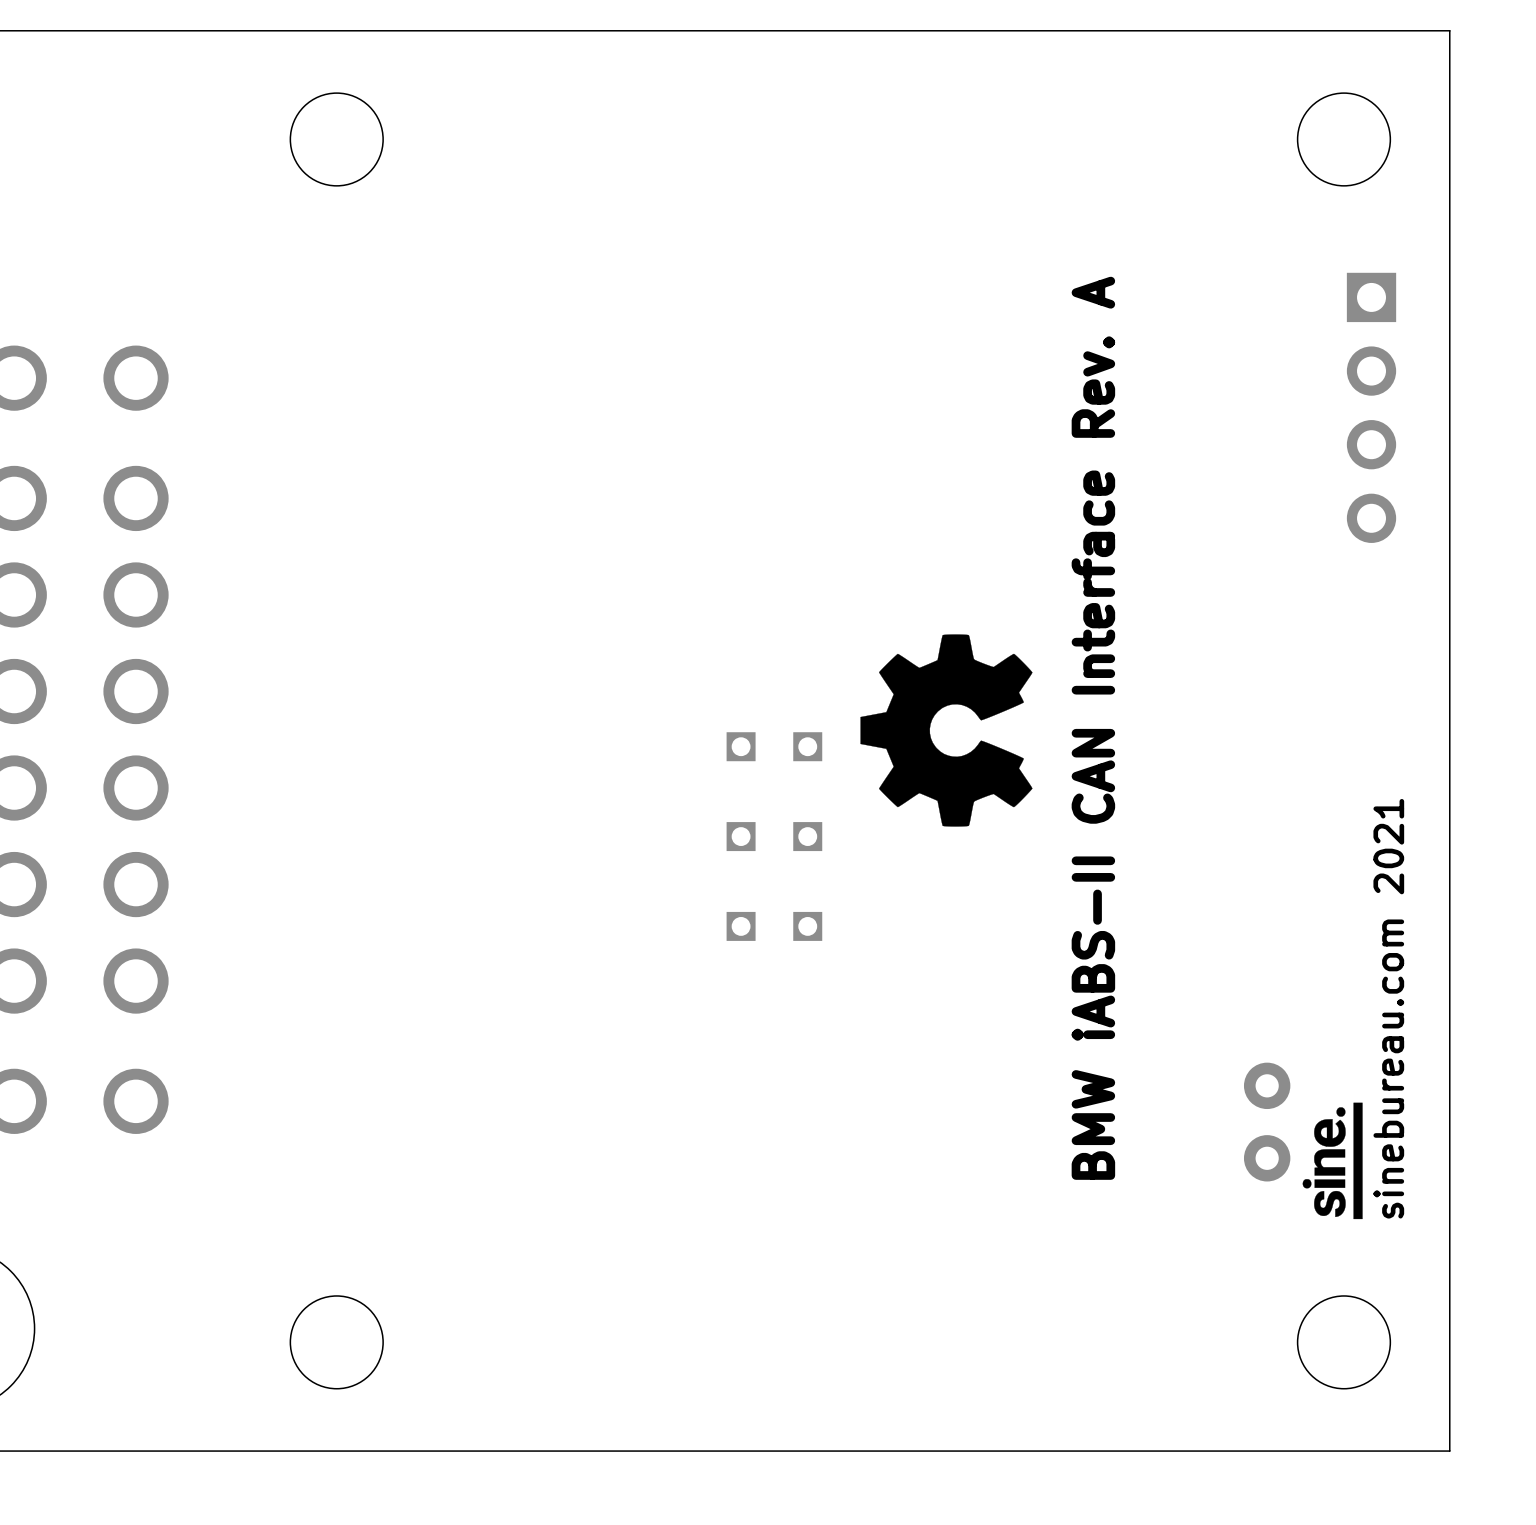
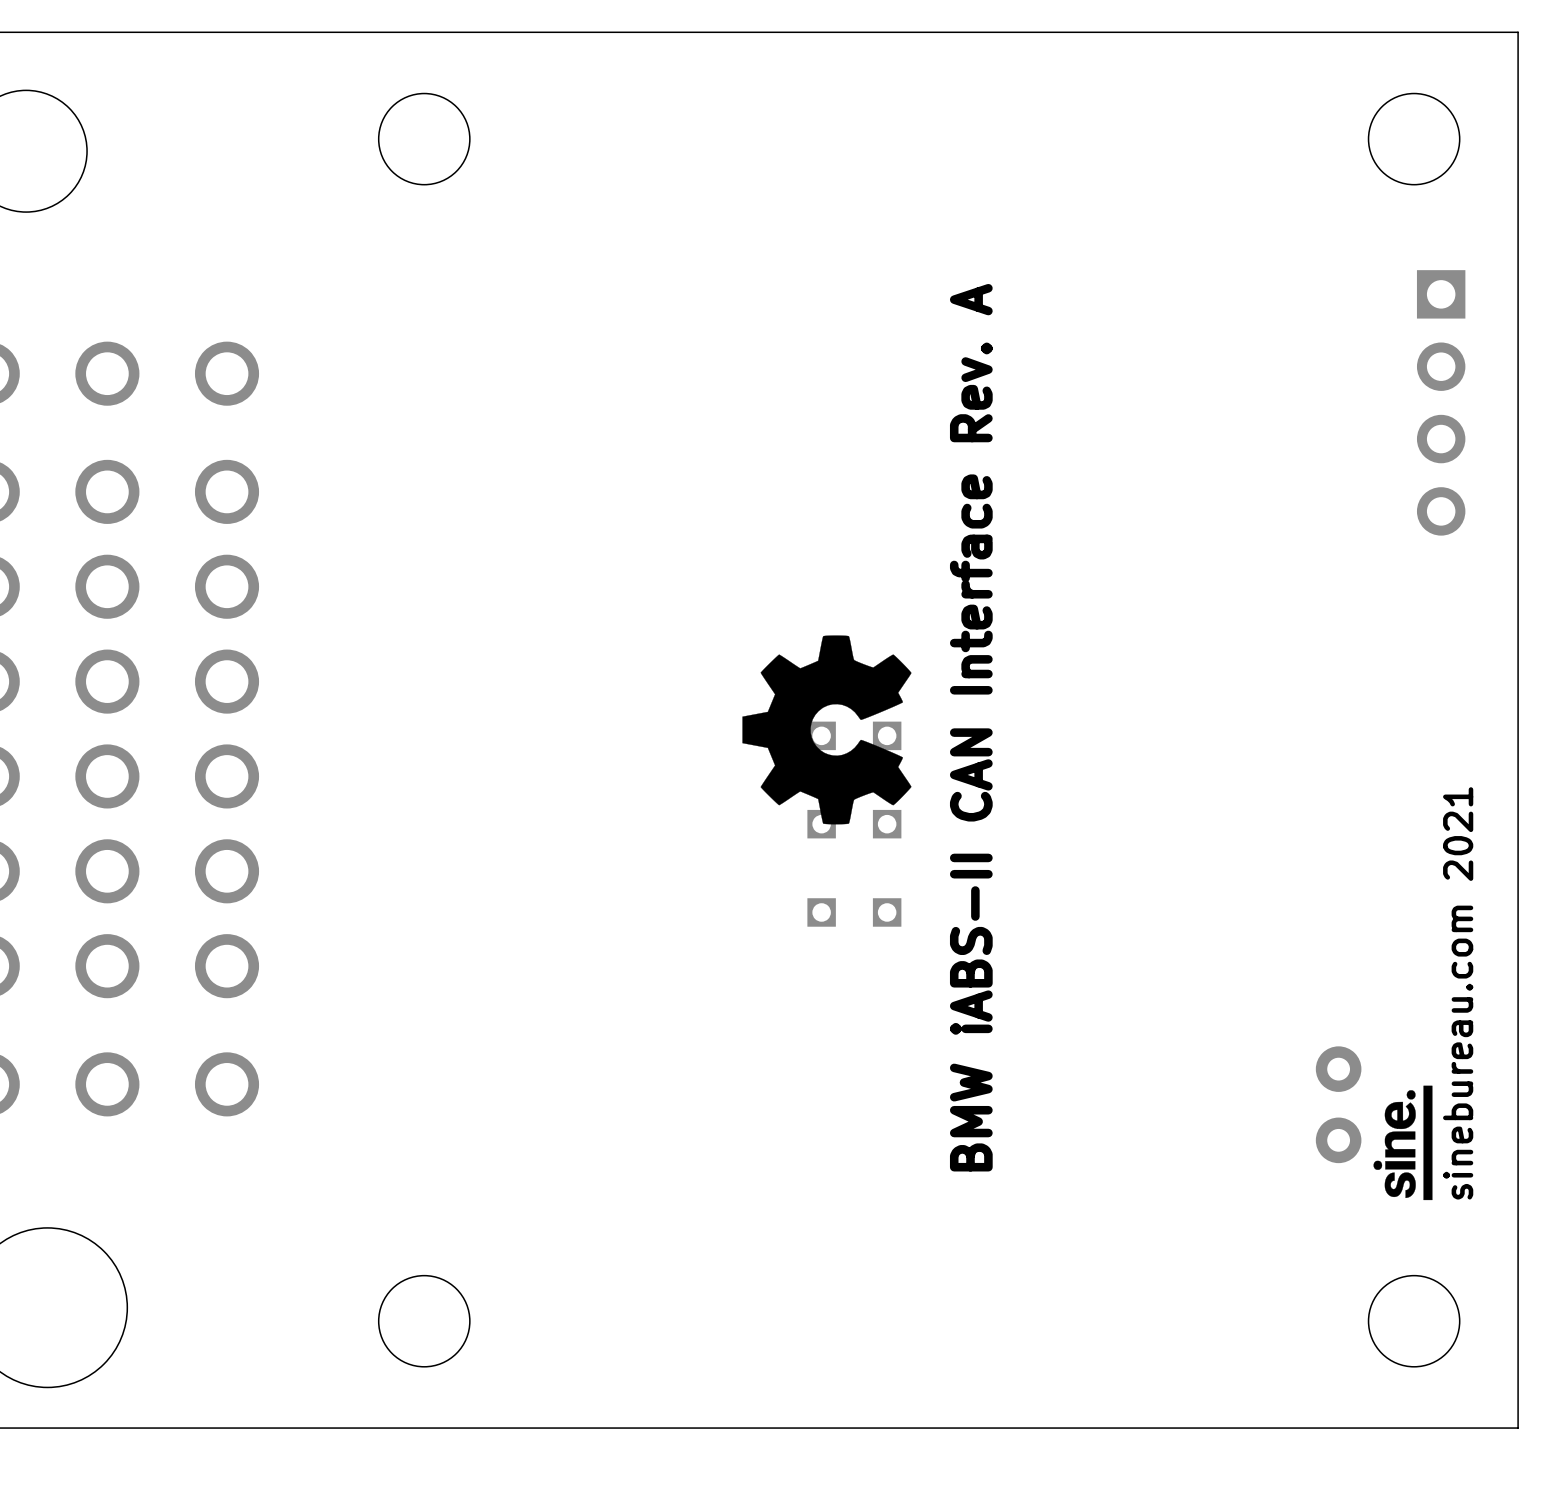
text position: BMW iABS-II CAN Interface Rev. A (1093, 728) -> BMW iABS-II CAN Interface Rev. A (971, 727)
drawing position: (946, 730) -> (826, 729)

